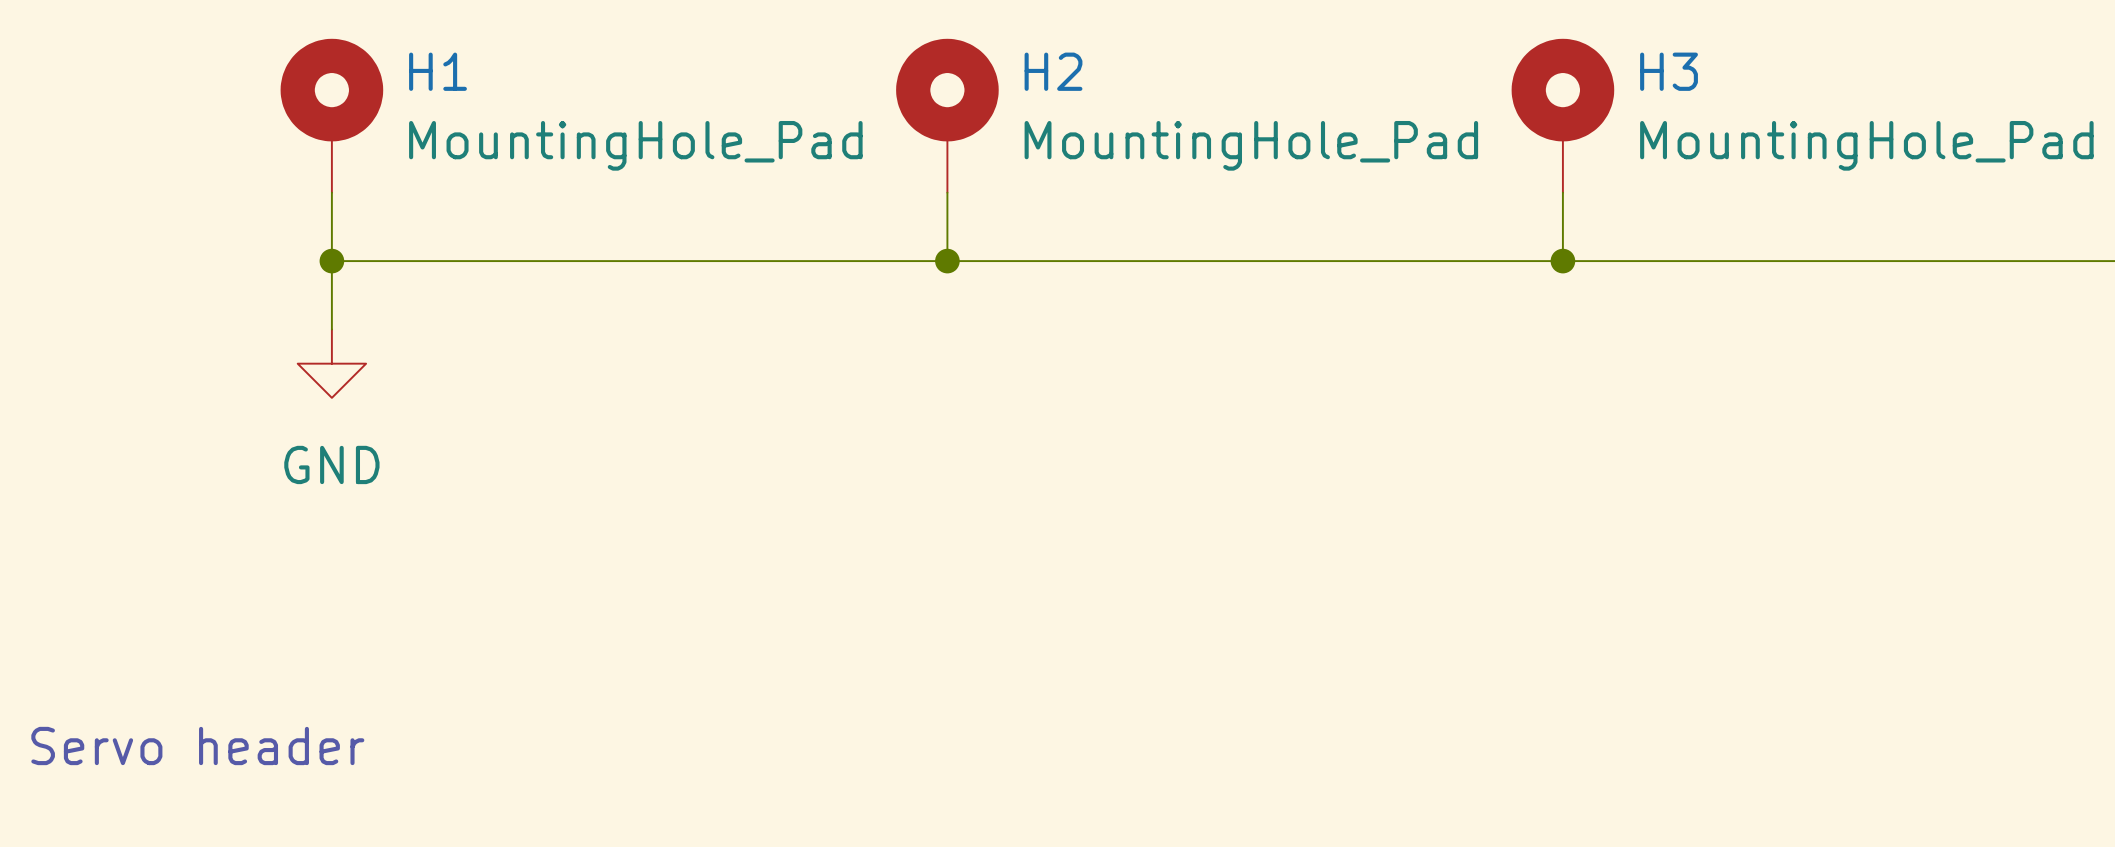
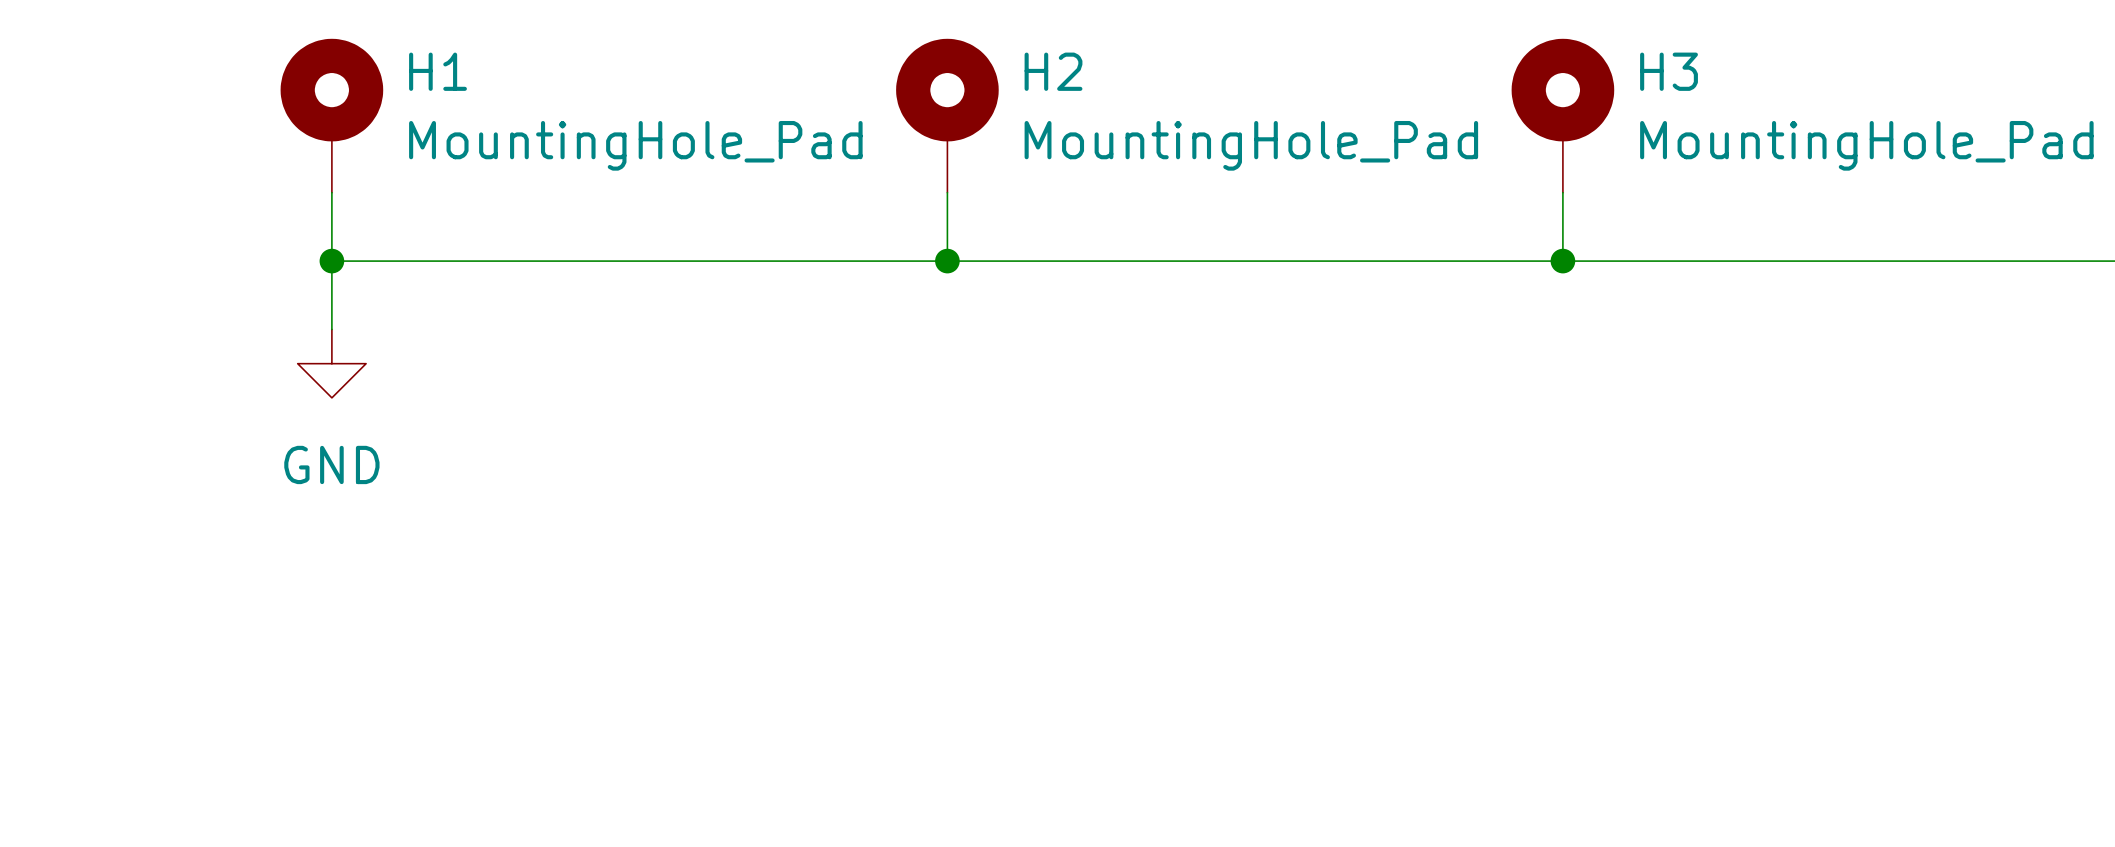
text: Servo header (197, 745) -> none

